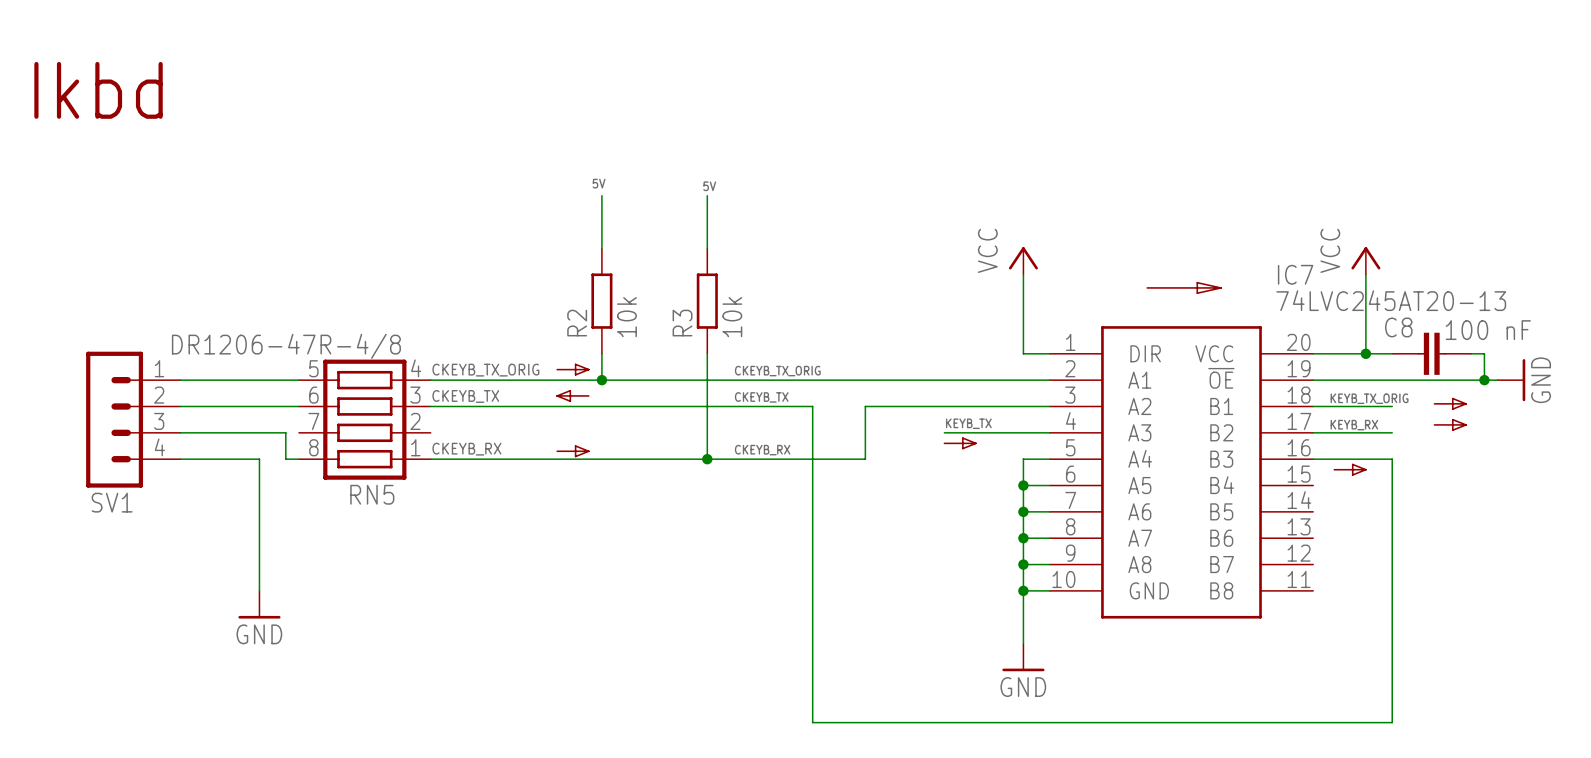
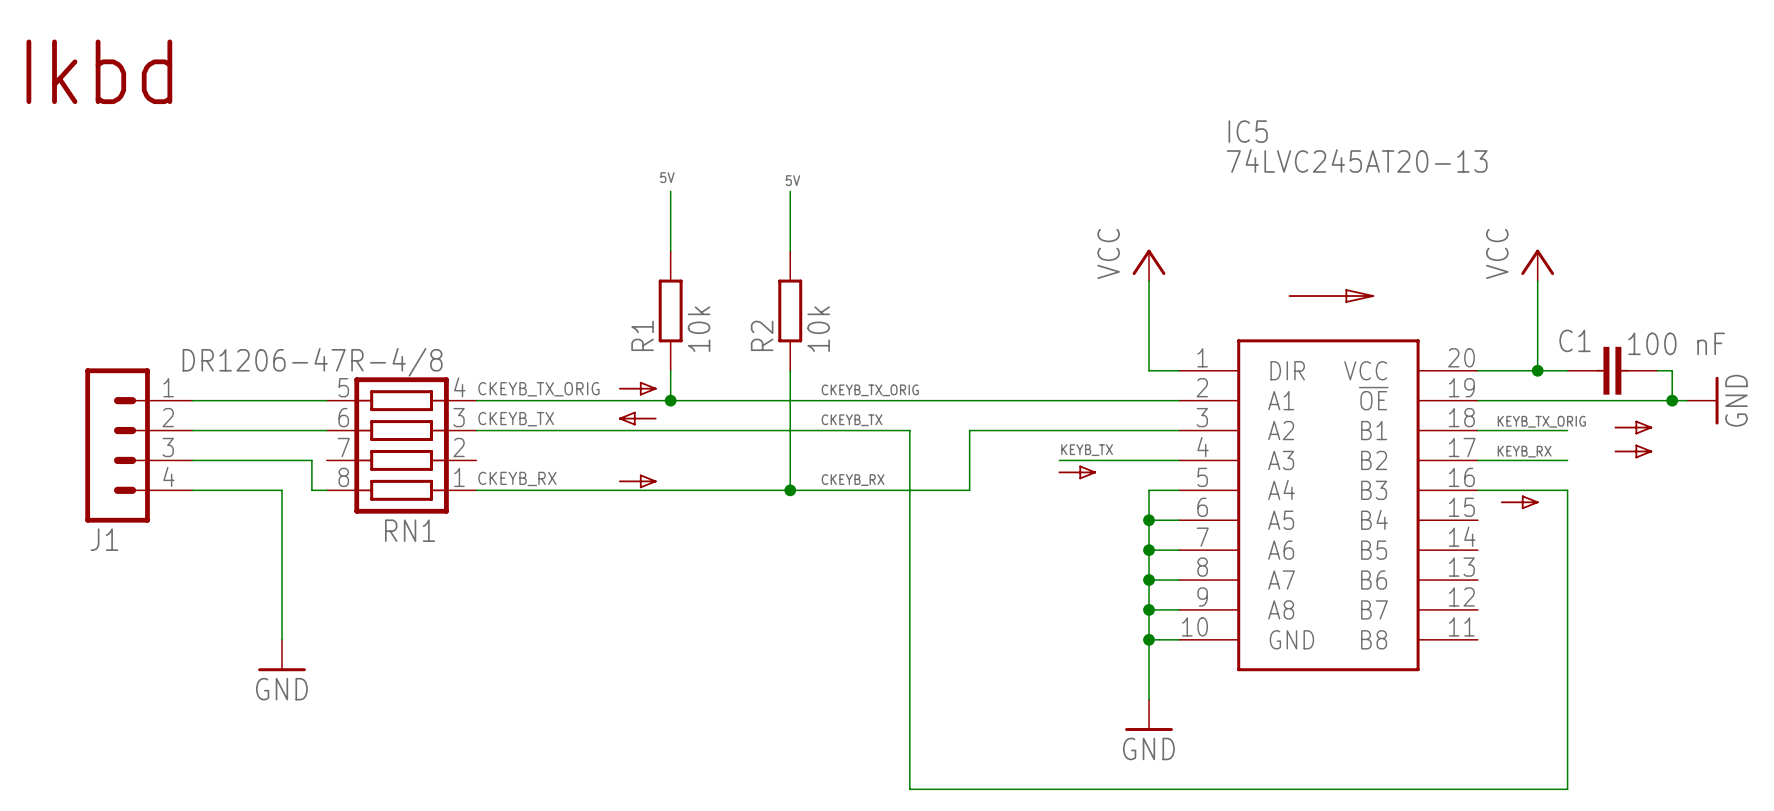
IC7 name: IC7 (1295, 274) -> IC5 (1248, 131)
IC7 value position: 74LVC245AT20-13 (1391, 300) -> 74LVC245AT20-13 (1357, 160)
R2 name: R2 (577, 323) -> R1 (642, 335)
R3 name: R3 (682, 323) -> R2 (762, 335)
C8 name: C8 (1398, 327) -> C1 (1574, 340)
RN5 name: RN5 (372, 494) -> RN1 (410, 530)
SV1 name: SV1 (112, 502) -> J1 (104, 539)

